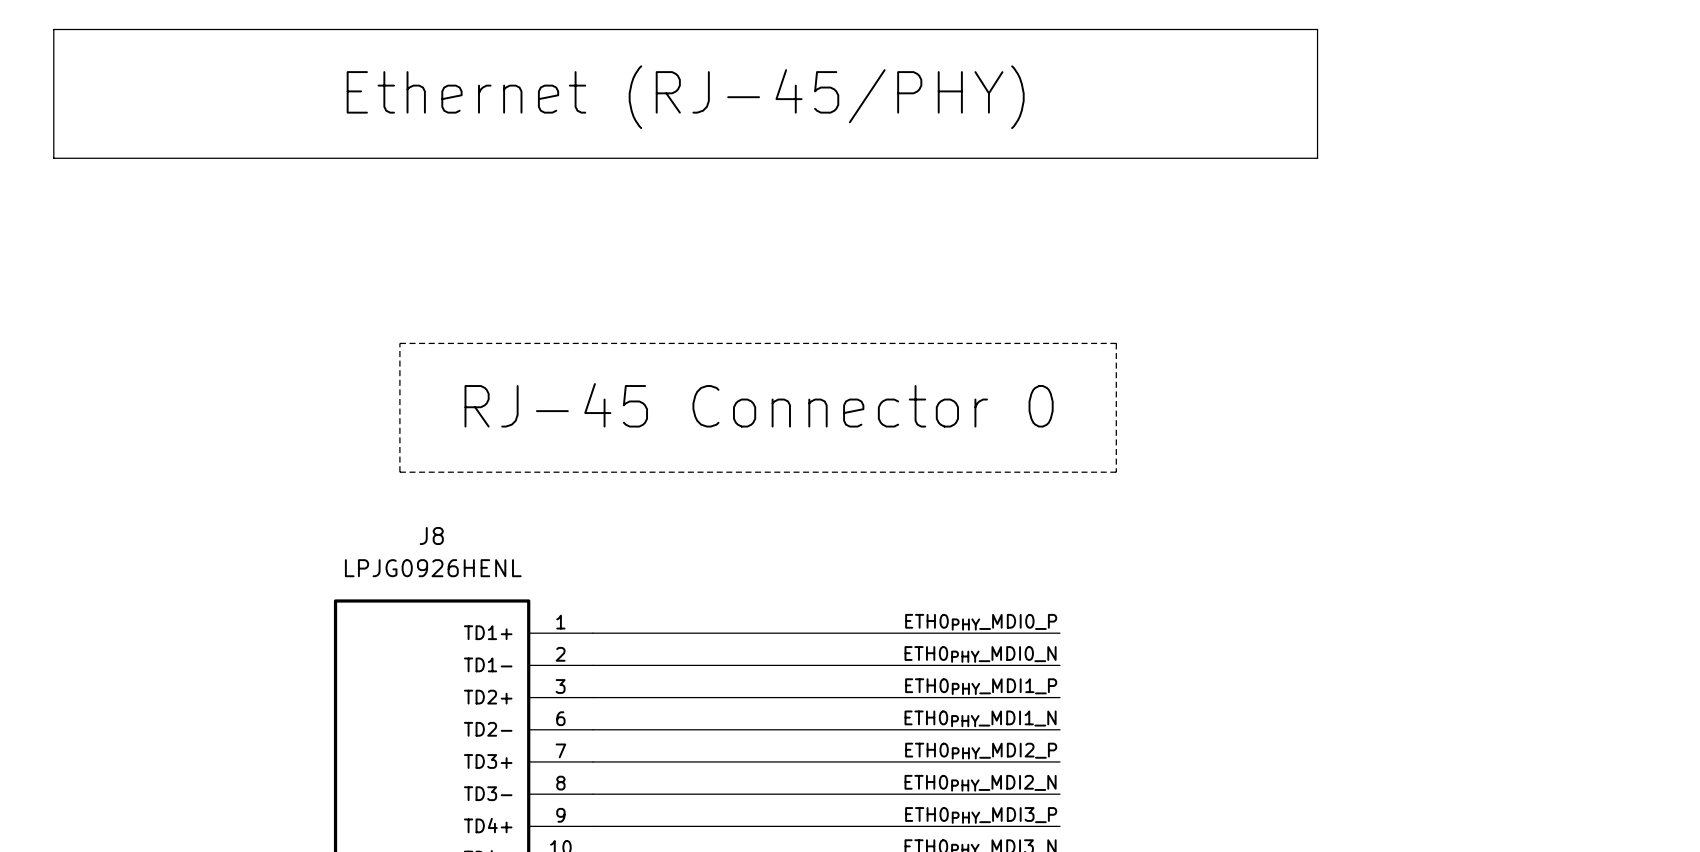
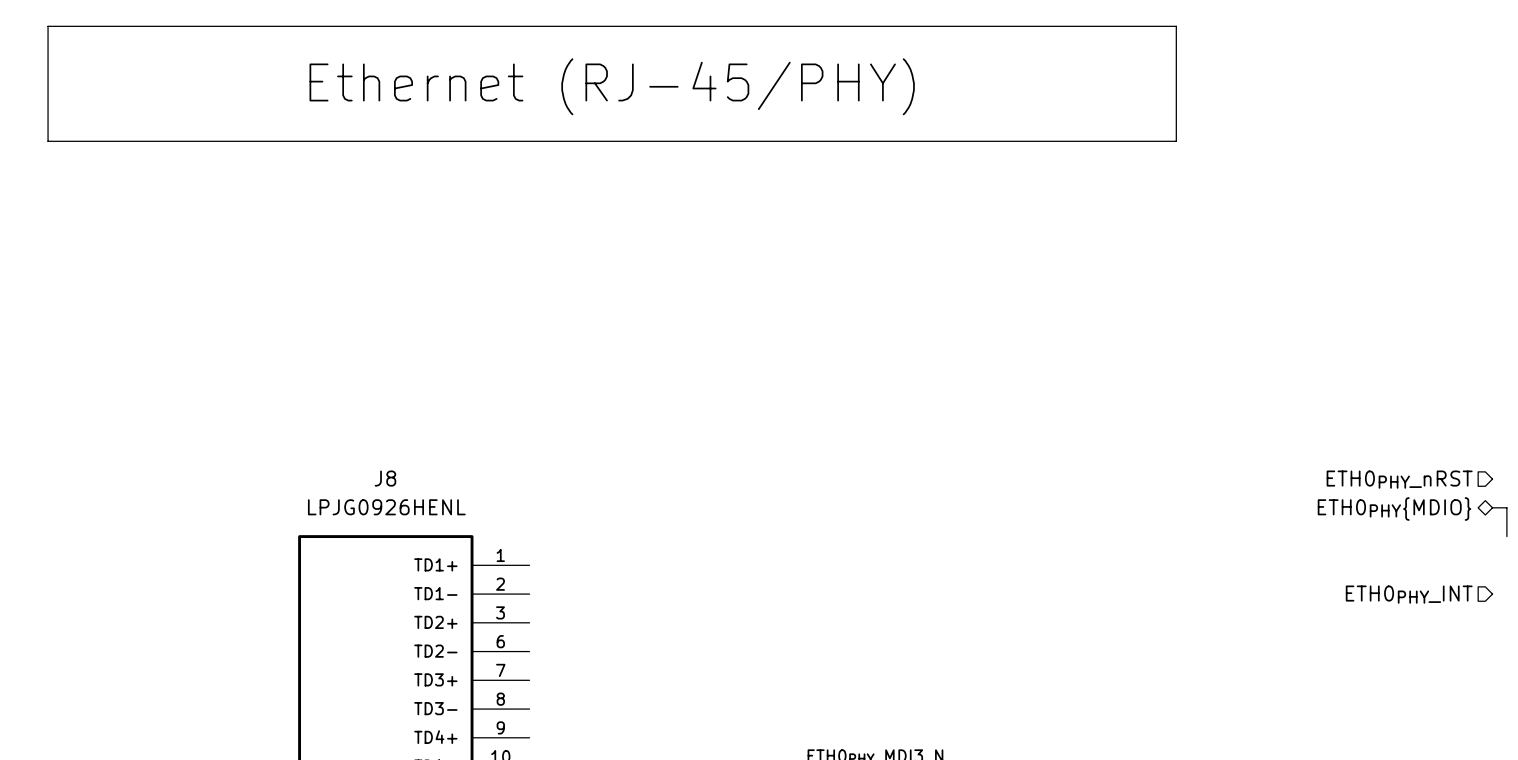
line: (399, 343) (1116, 343) (1116, 472) (399, 472) (399, 343) -> none
text: RJ-45 Connector 0 (759, 405) -> none
hierarchical label: none -> ETH0PHY_nRST (1399, 479)
bus: none -> (1492, 507) (1506, 507) (1506, 536)
hierarchical label: none -> ETH0PHY{MDIO} (1394, 509)
label: ETH0PHY_MDI0_P (981, 622) -> none
wire: (593, 633) (1059, 633) -> none
label: ETH0PHY_MDI0_N (980, 654) -> none
wire: (593, 665) (1059, 665) -> none
hierarchical label: none -> ETH0PHY_INT (1409, 594)
label: ETH0PHY_MDI1_P (981, 686) -> none
wire: (593, 697) (1059, 697) -> none
label: ETH0PHY_MDI1_N (980, 718) -> none
wire: (593, 729) (1059, 729) -> none
label: ETH0PHY_MDI2_P (981, 751) -> none
wire: (593, 761) (1059, 761) -> none
label: ETH0PHY_MDI2_N (980, 783) -> none
wire: (593, 794) (1059, 794) -> none
label: ETH0PHY_MDI3_P (981, 815) -> none
wire: (593, 826) (1059, 826) -> none

